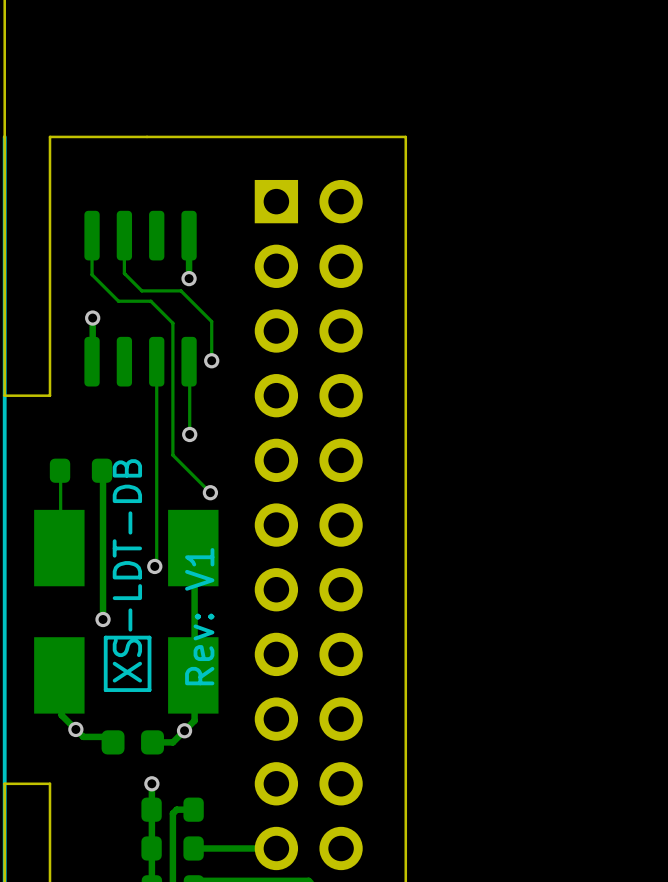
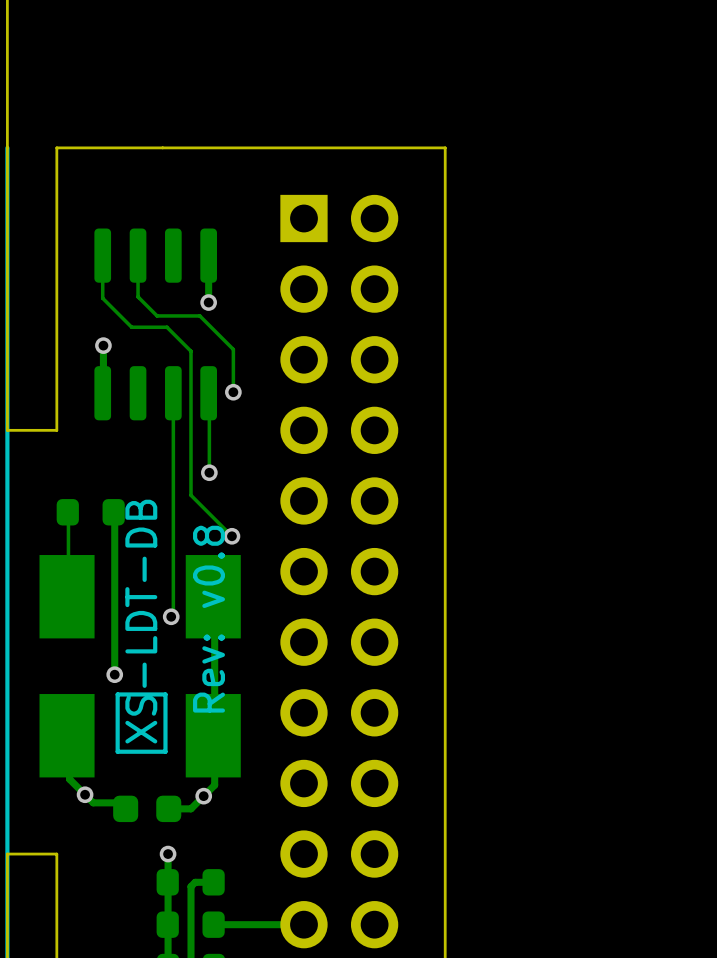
text: Rev: V1 (199, 616) -> Rev: v0.8 (209, 619)

